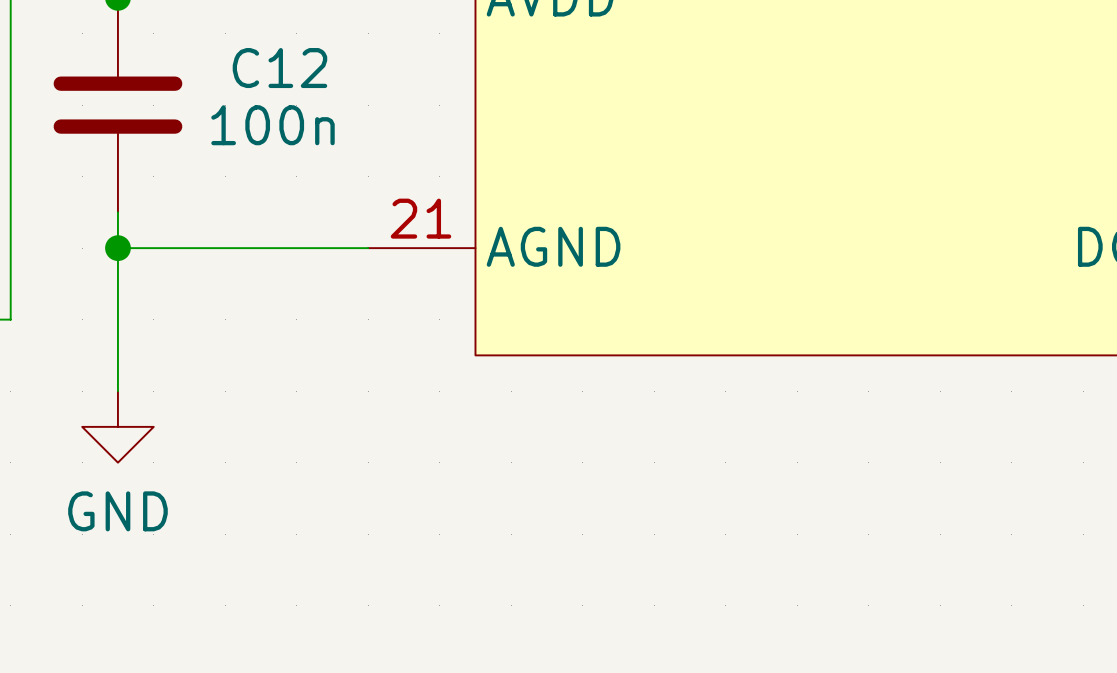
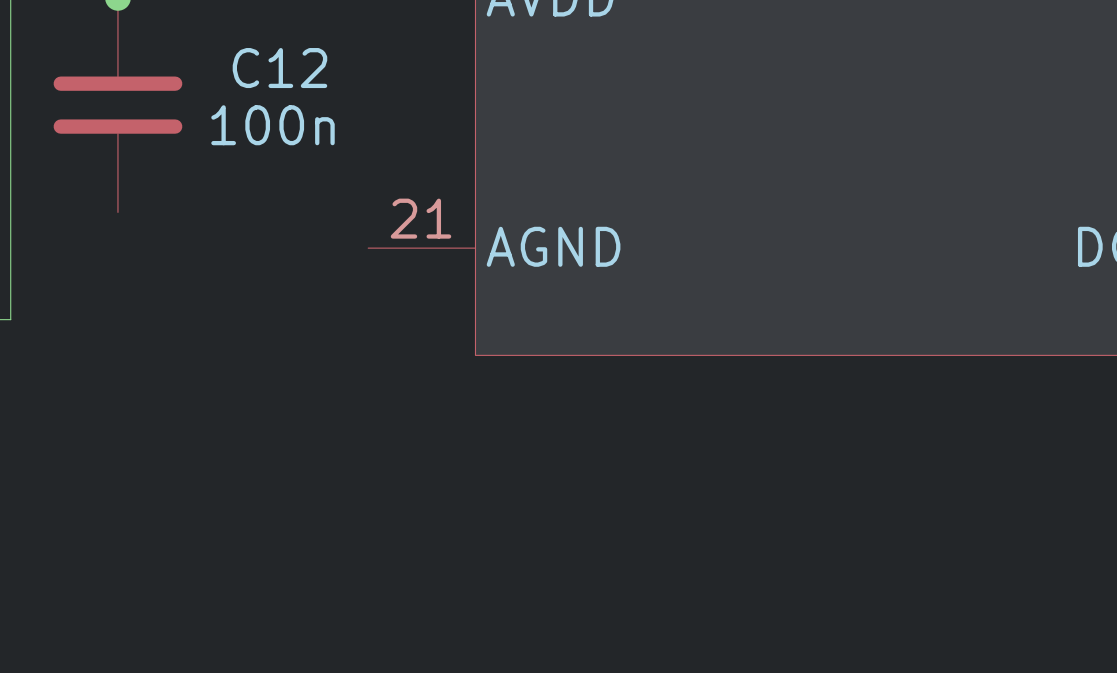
wire: (117, 212) (117, 391) -> none
wire: (117, 248) (368, 248) -> none
junction: (117, 248) -> none
power symbol: GND (117, 426) -> none

